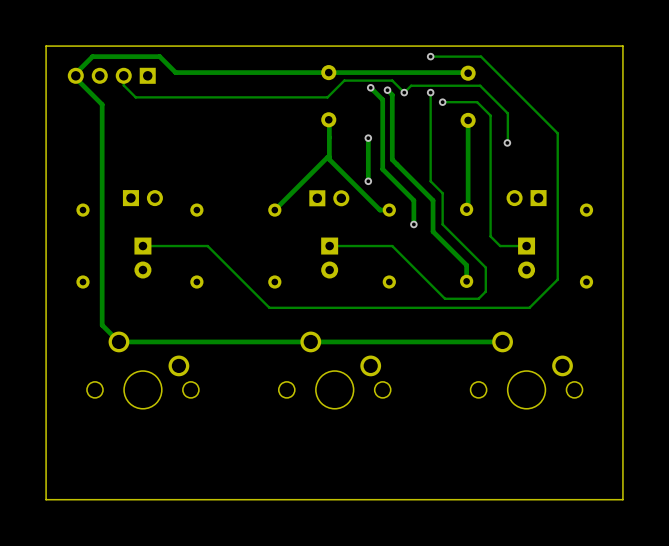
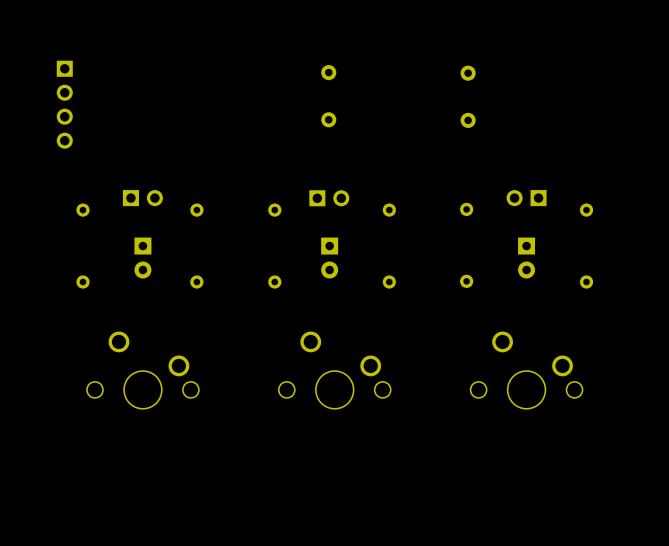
board edge: (622, 46) (46, 46) (46, 499) (622, 499) (622, 46) -> none
track: (430, 56) (481, 56) (557, 133) (557, 279) (529, 307) (269, 307) (207, 246) (142, 246) -> none
via: (430, 56) -> none
track: (461, 71) (465, 75) (468, 73) (467, 72) (175, 72) (159, 56) (92, 56) (75, 73) (75, 75) (73, 75) (102, 104) (102, 325) (118, 341) (502, 341) -> none
part rotation: 0° (111, 75) -> 90° counterclockwise (64, 104)
part position: (111, 75) -> (64, 104)
track: (123, 75) (123, 85) (135, 97) (327, 97) (344, 80) (392, 80) (404, 92) (411, 85) (480, 85) (507, 113) (507, 142) -> none
track: (370, 87) (382, 99) (382, 169) (413, 200) (413, 224) -> none
via: (370, 87) -> none
track: (387, 90) (392, 94) (392, 159) (433, 200) (433, 231) (466, 265) (466, 281) -> none
via: (387, 90) -> none
via: (404, 92) -> none
track: (430, 92) (430, 181) (442, 193) (442, 224) (485, 267) (485, 291) (478, 298) (445, 298) (392, 246) (329, 246) -> none
via: (430, 92) -> none
track: (442, 102) (477, 102) (490, 115) (490, 236) (500, 246) (526, 246) -> none
via: (442, 102) -> none
track: (468, 120) (466, 209) -> none
track: (329, 122) (329, 159) (379, 210) (389, 210) -> none
track: (368, 138) (368, 181) -> none
via: (368, 138) -> none
via: (507, 142) -> none
track: (329, 157) (274, 210) -> none
via: (368, 181) -> none
via: (413, 224) -> none

